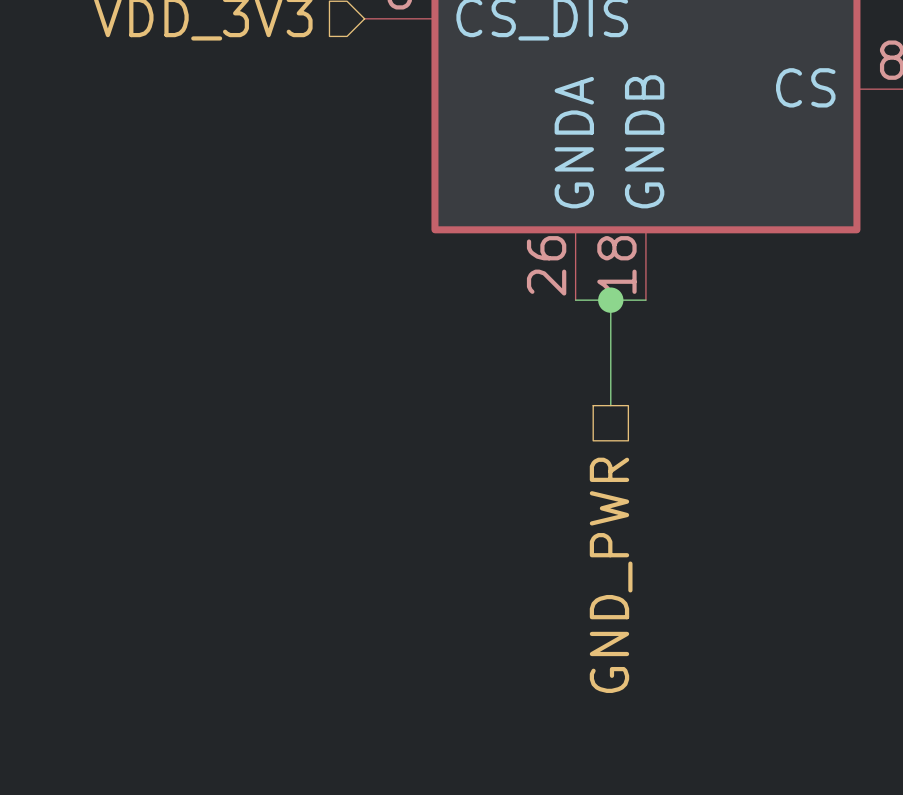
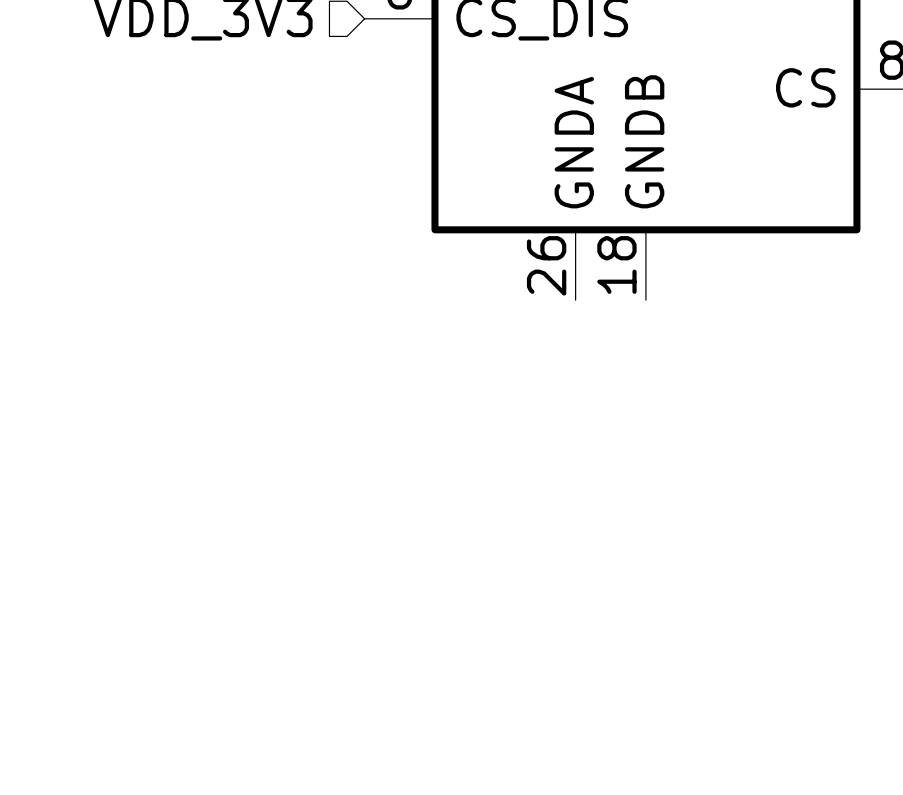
wire: (575, 300) (645, 300) -> none
wire: (610, 300) (610, 405) -> none
junction: (610, 300) -> none
hierarchical label: GND_PWR (611, 575) -> none

